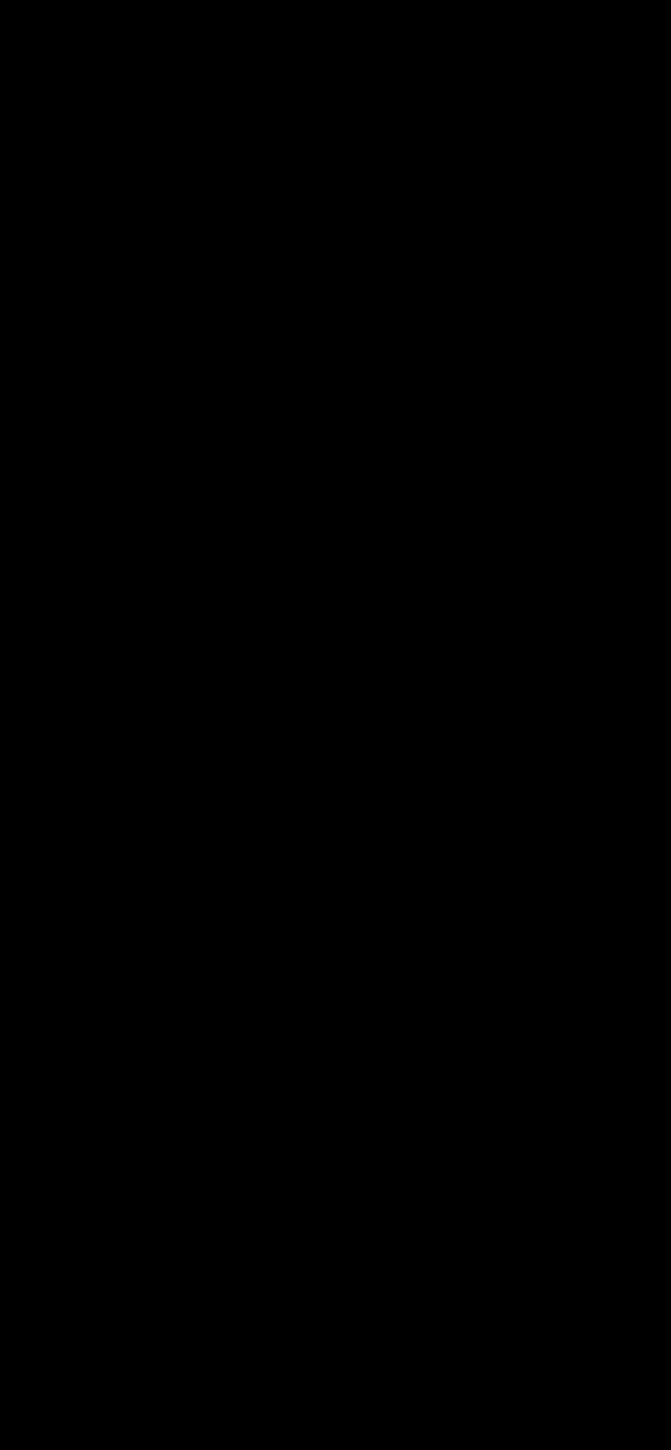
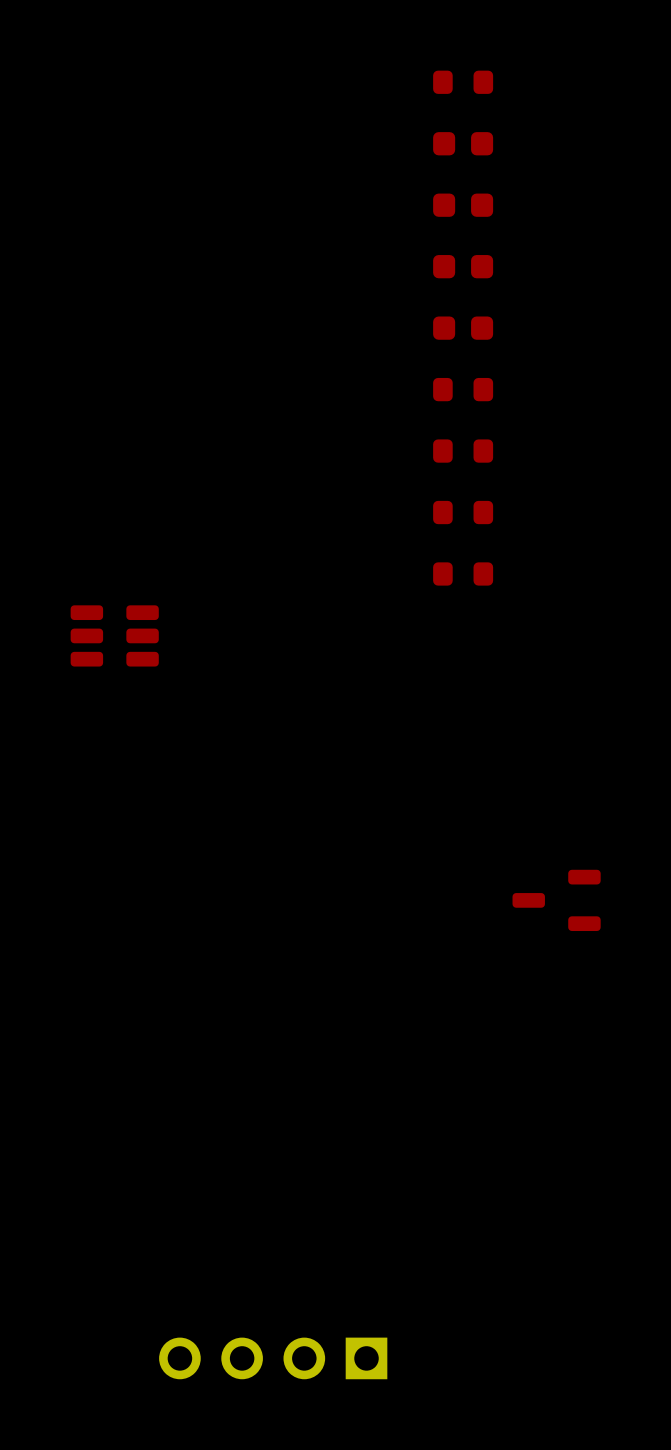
part: none -> (463, 82)
part: none -> (463, 143)
part: none -> (463, 205)
part: none -> (463, 266)
part: none -> (463, 328)
part: none -> (463, 389)
part: none -> (463, 451)
part: none -> (463, 512)
part: none -> (463, 573)
part: none -> (114, 635)
part: none -> (556, 900)
part: none -> (273, 1358)

